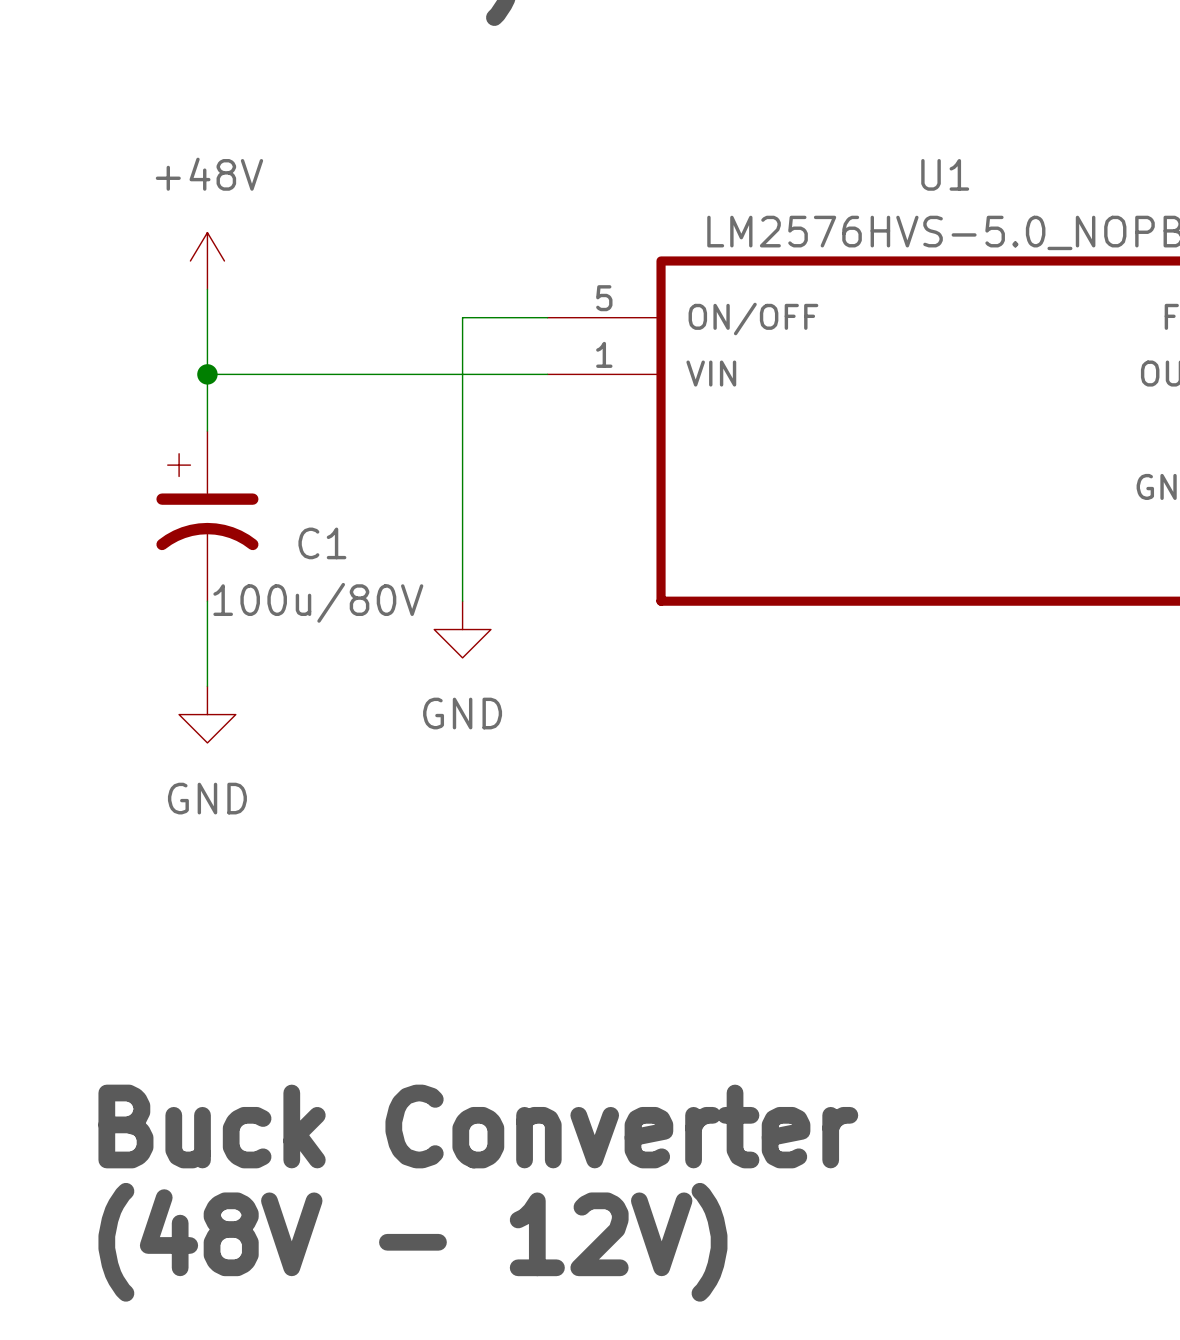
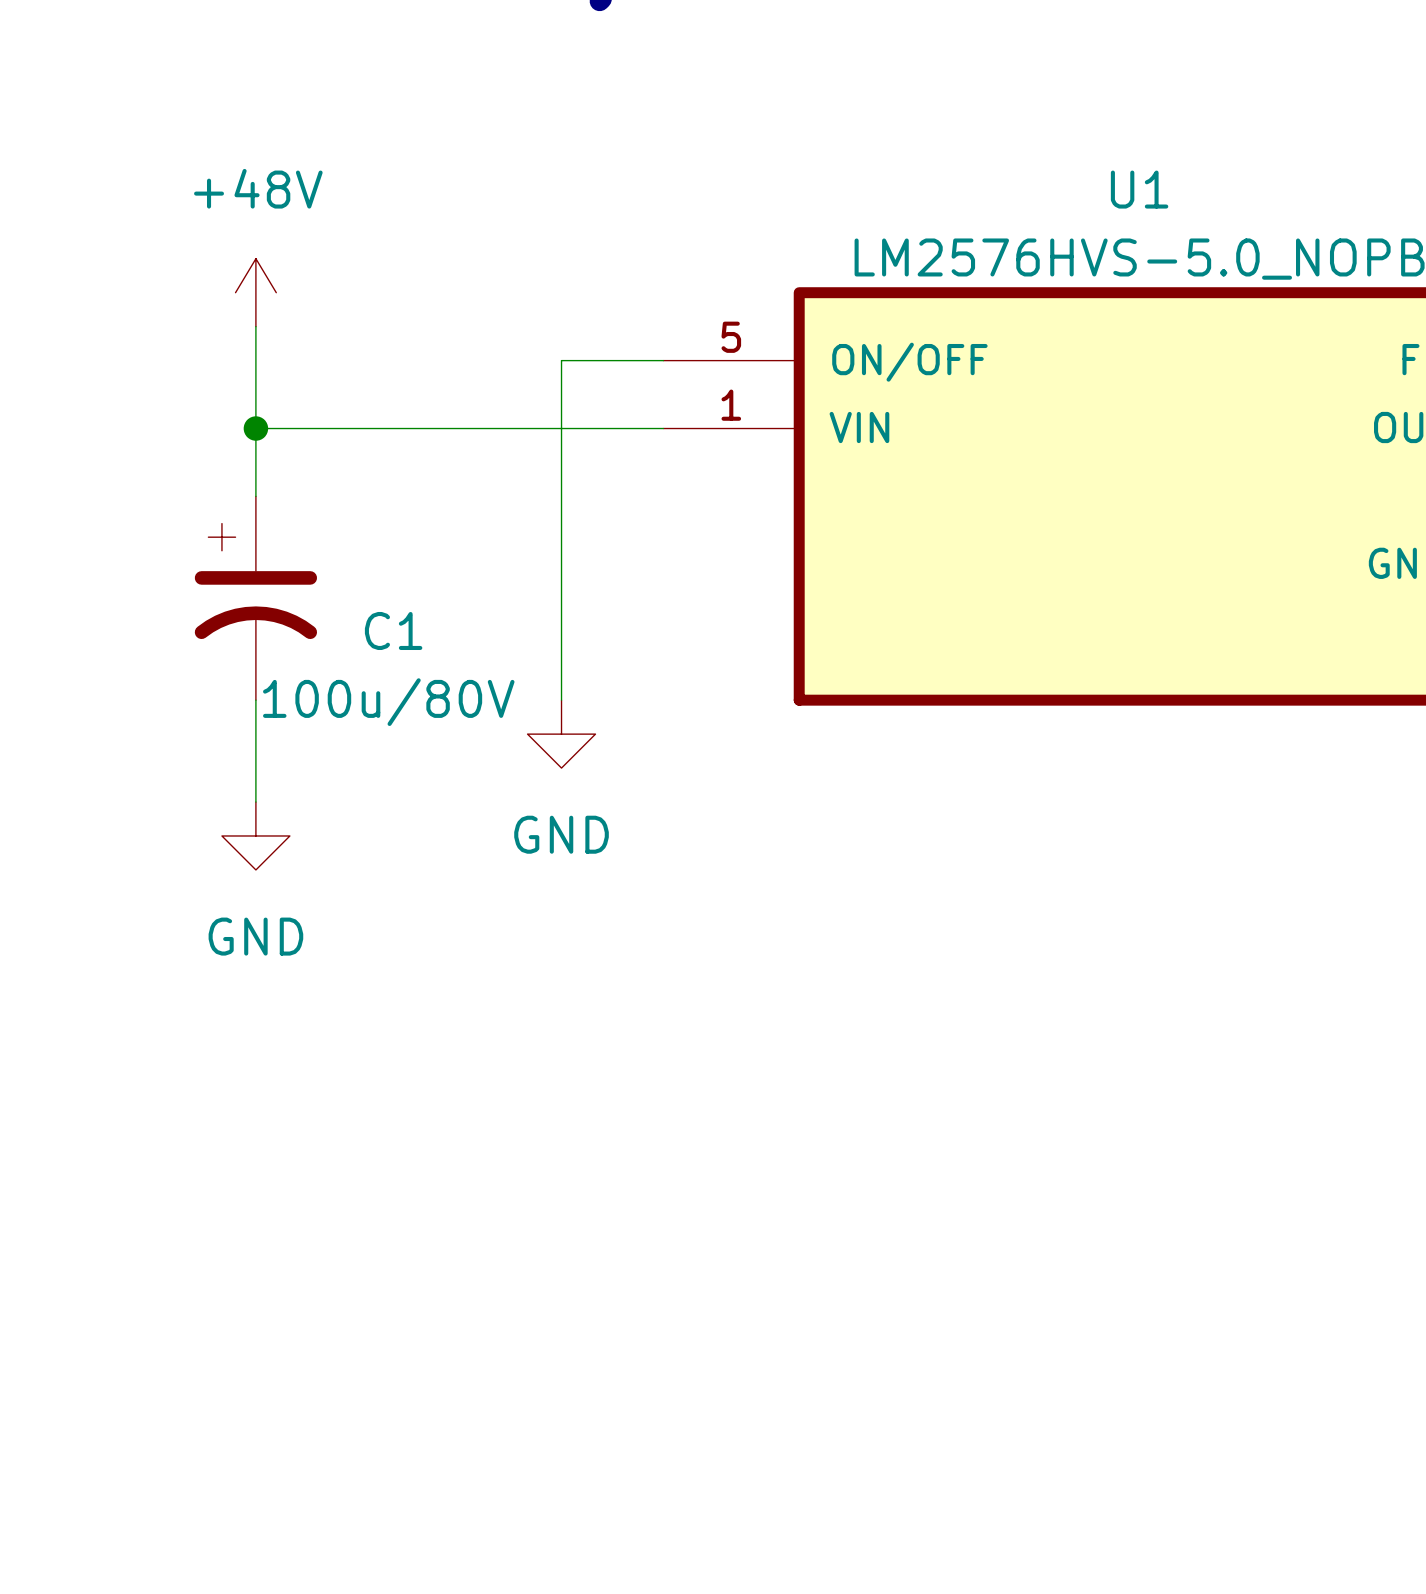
text: Buck Converter (478, 1126) -> none
text: (48V - 12V) (412, 1242) -> none

